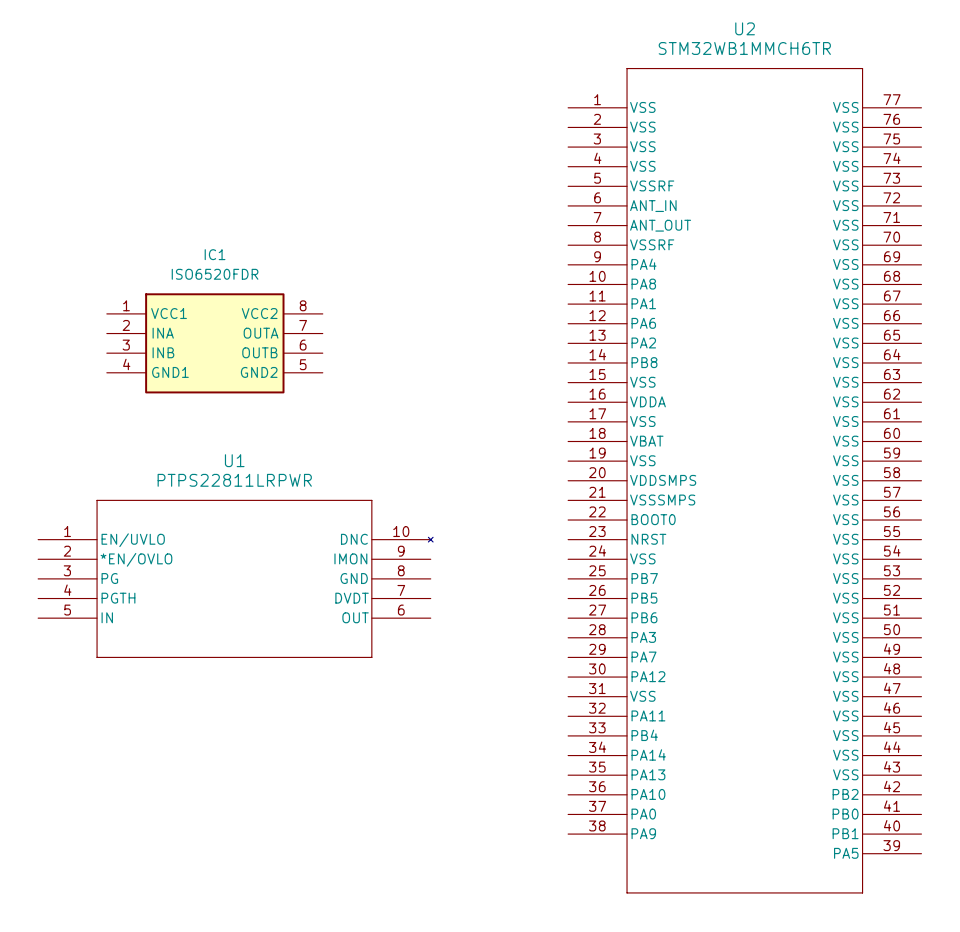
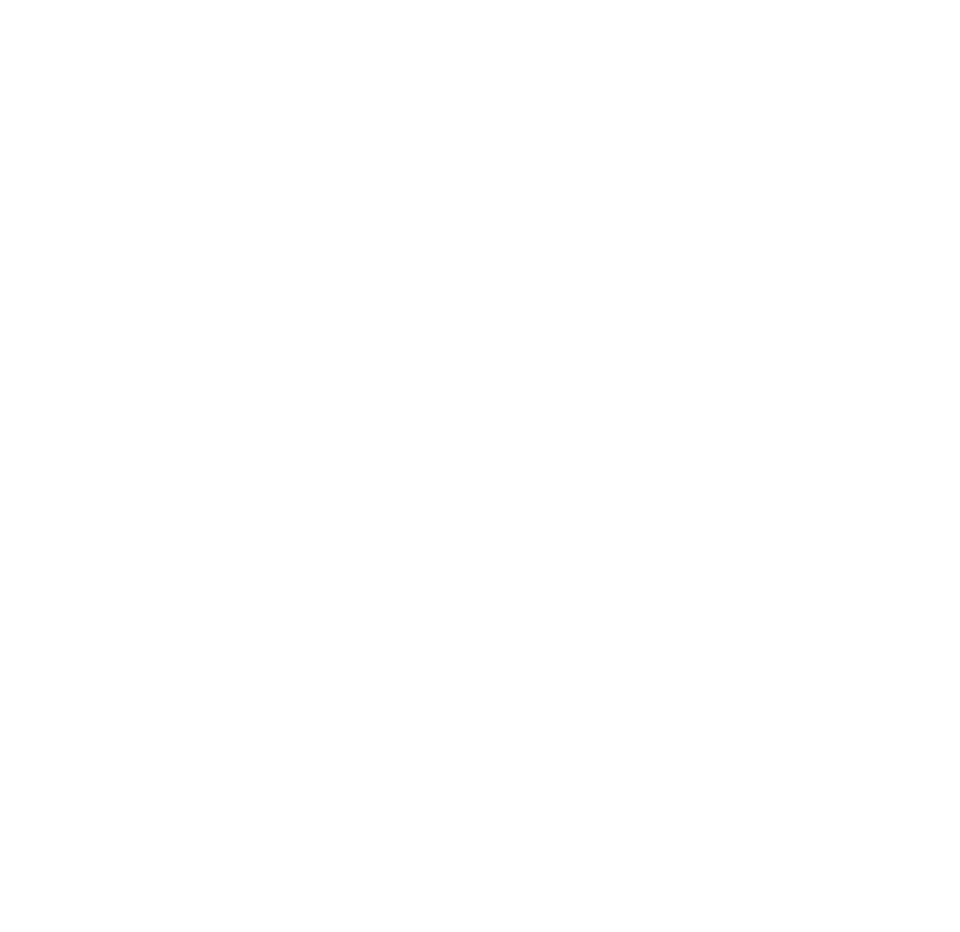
IC1: ISO6520FDR (214, 343) -> none
U2: STM32WB1MMCH6TR (744, 480) -> none
U1: PTPS22811LRPWR (235, 578) -> none

